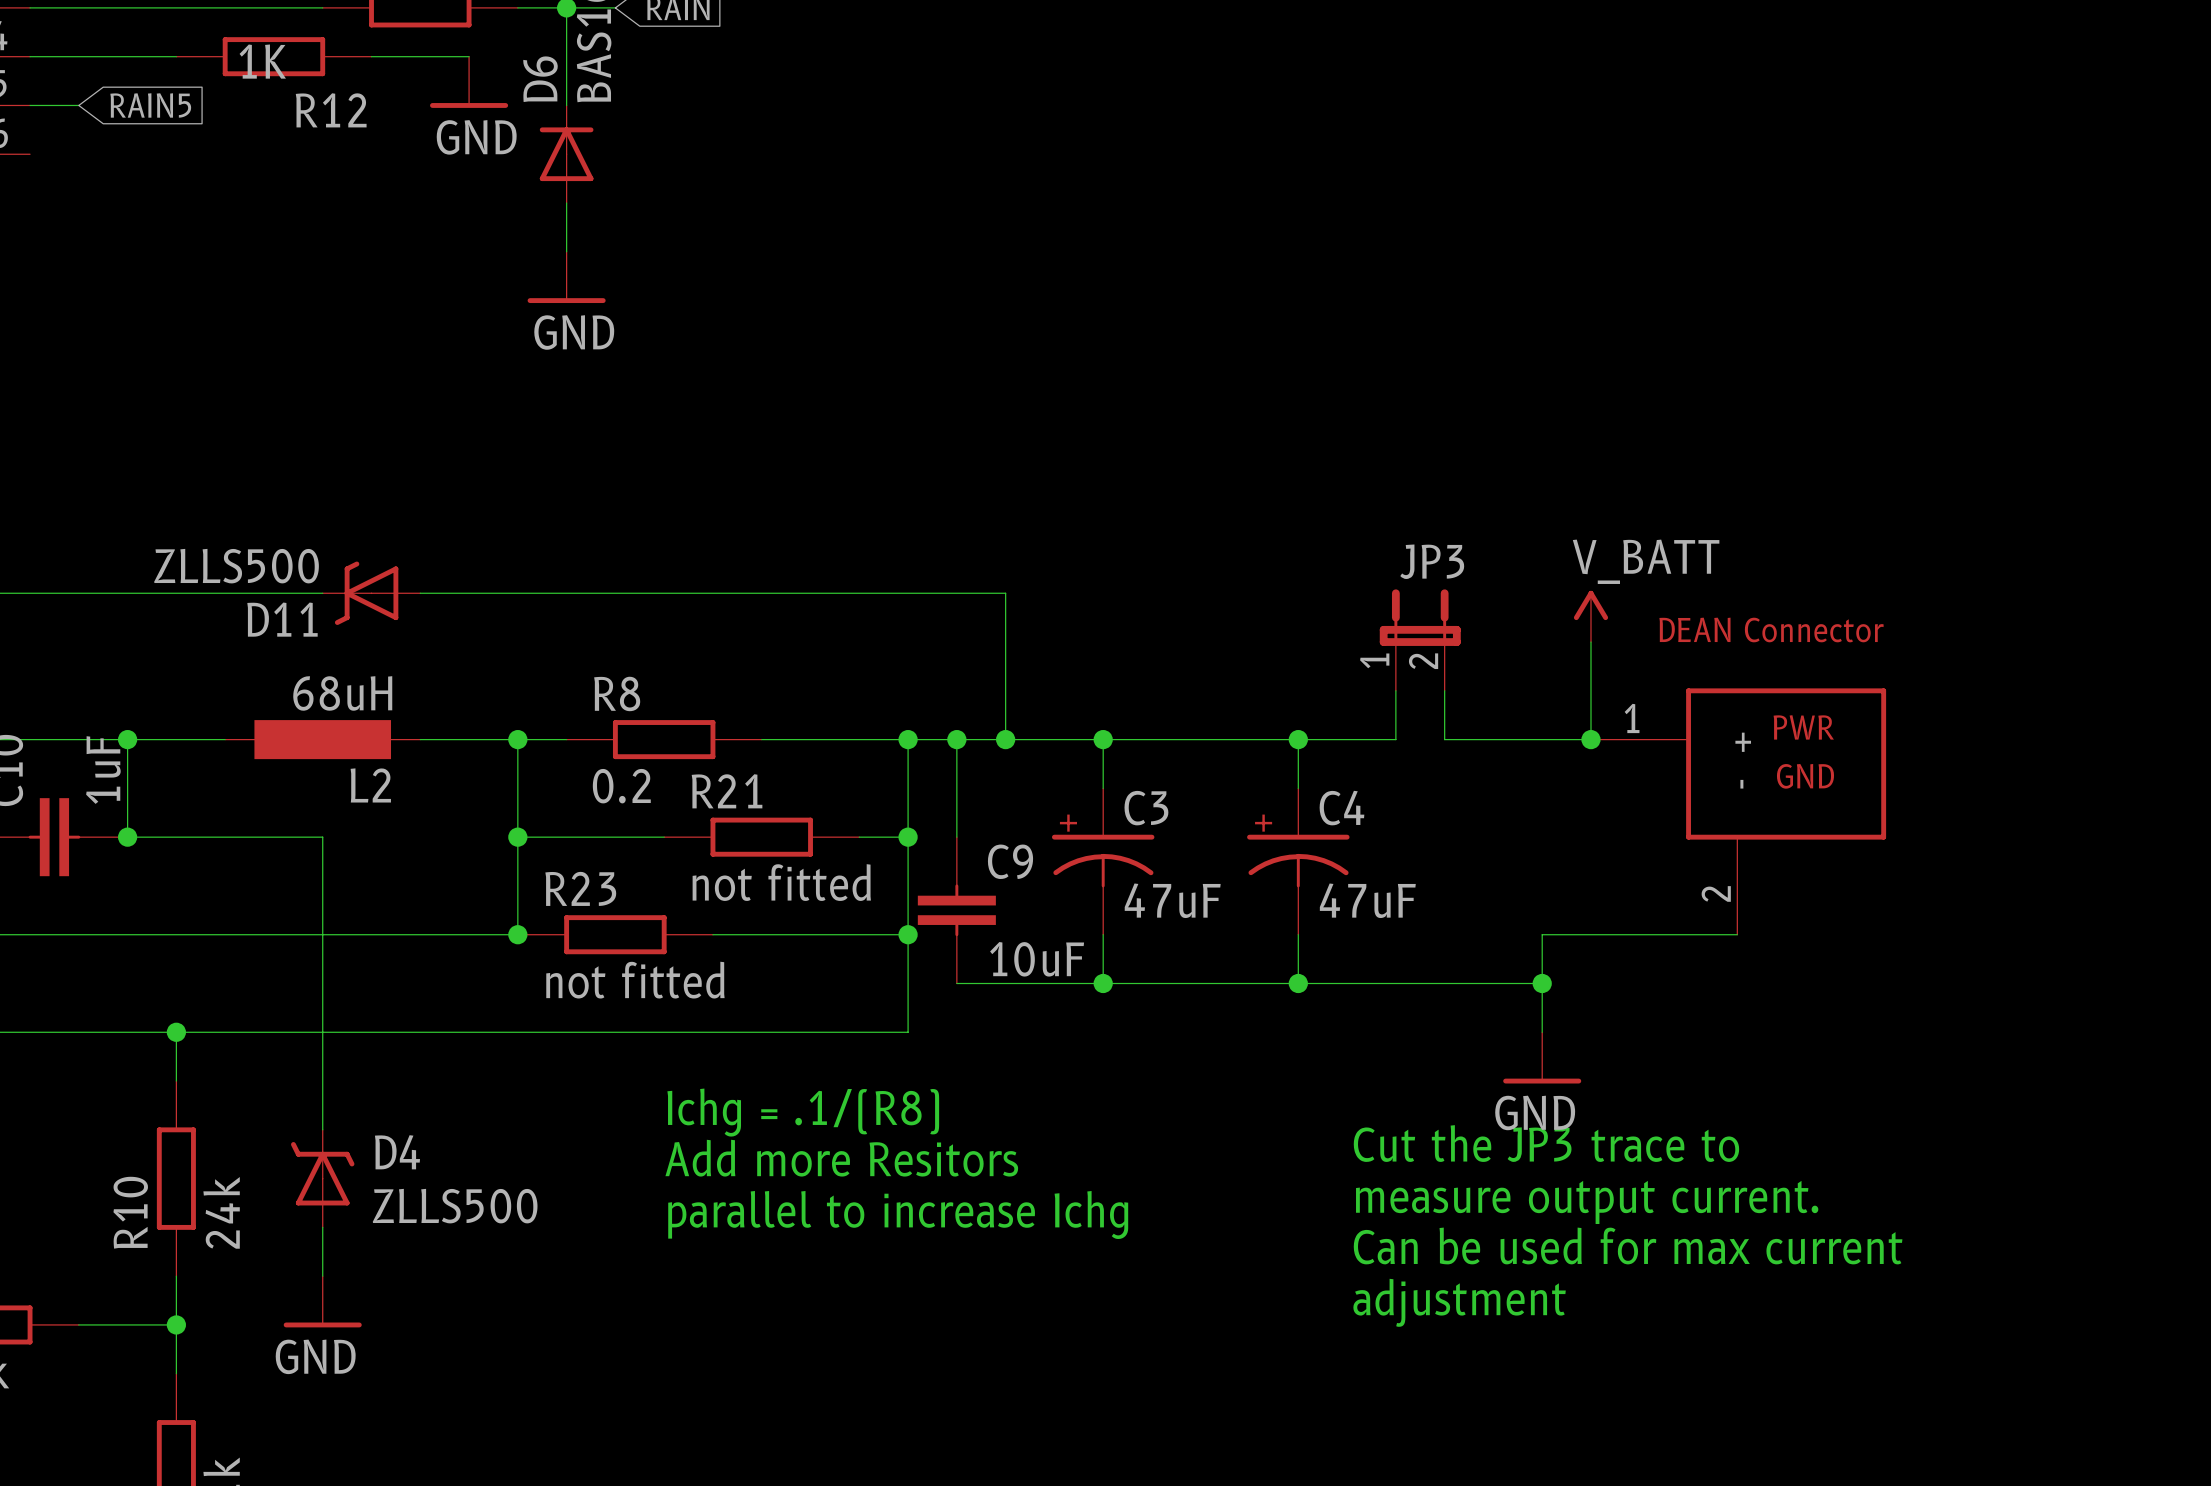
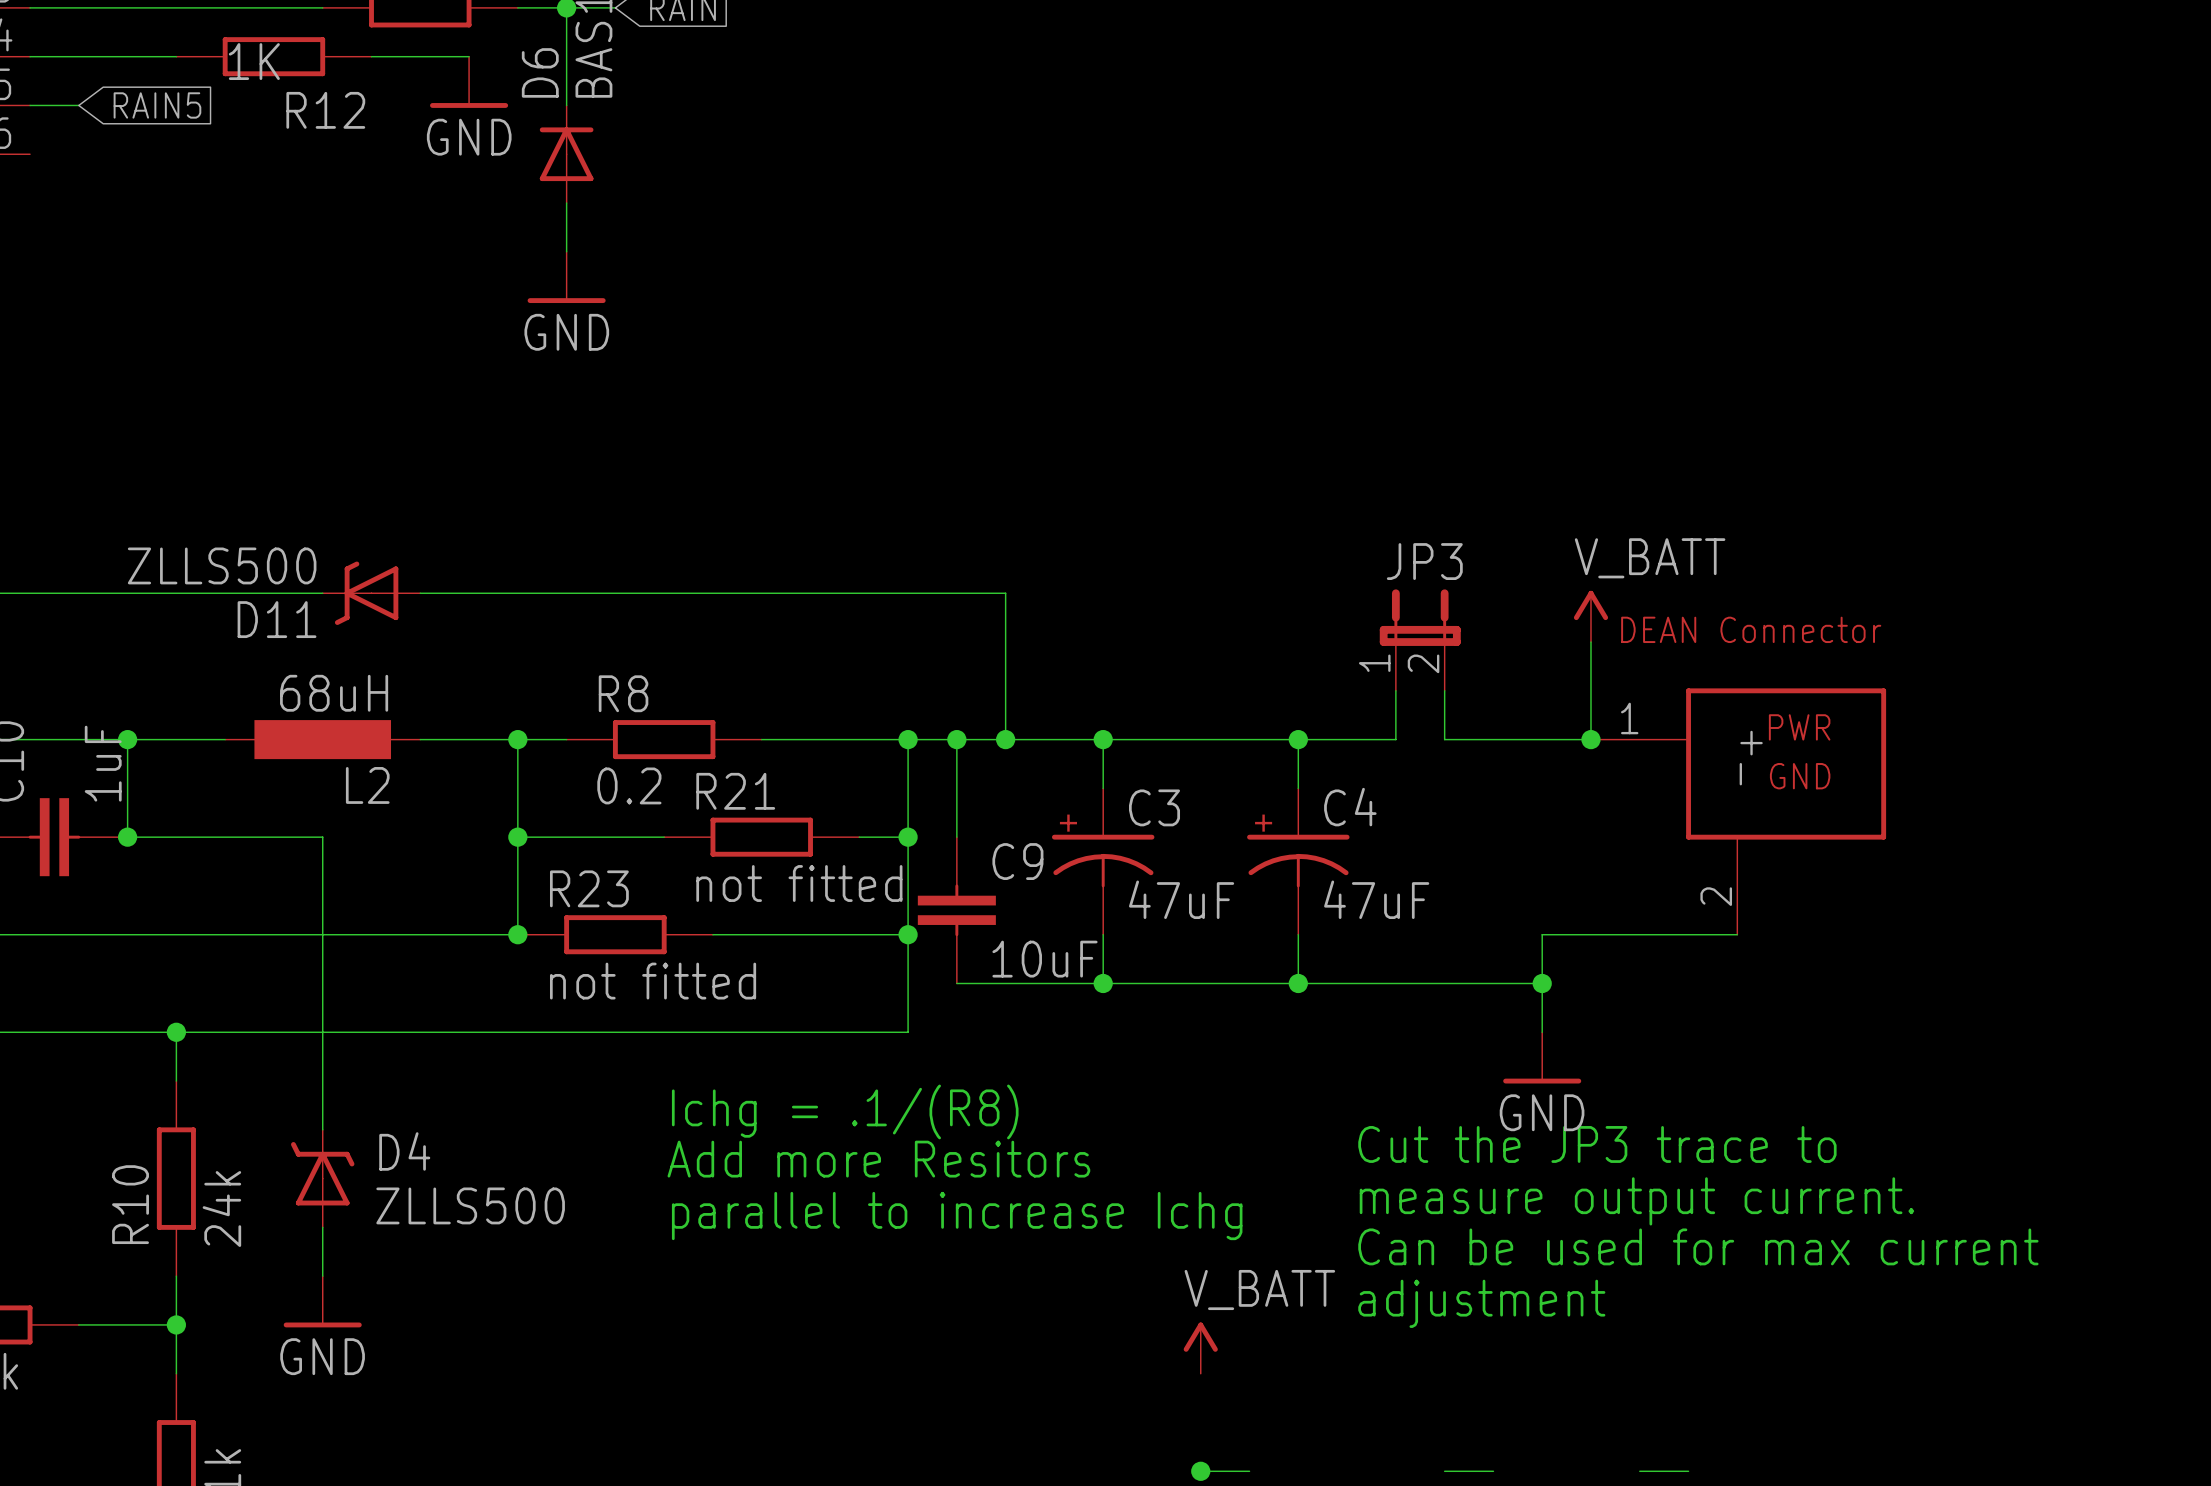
power symbol: none -> V_BATT (1200, 1348)
wire: none -> (1200, 1471) (1249, 1471)
junction: none -> (1200, 1471)
wire: none -> (1444, 1471) (1493, 1471)
wire: none -> (1639, 1471) (1688, 1471)

